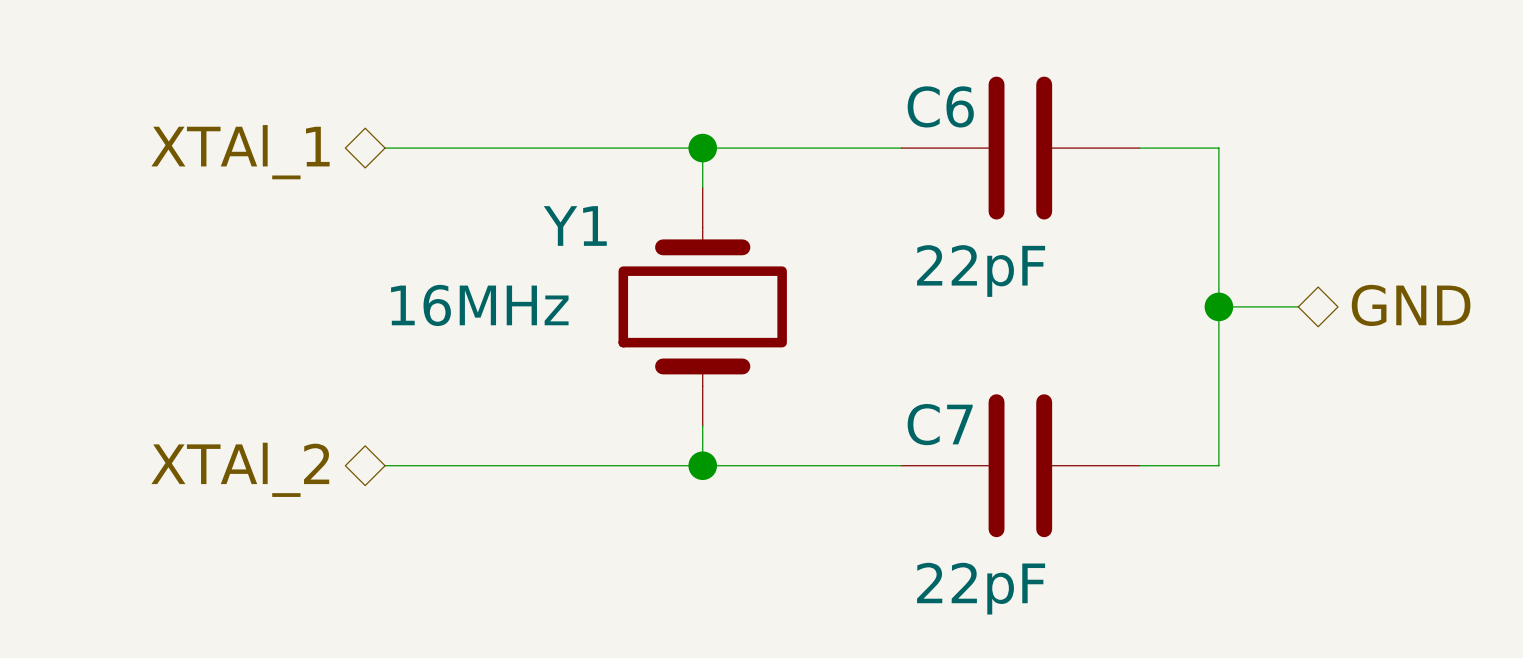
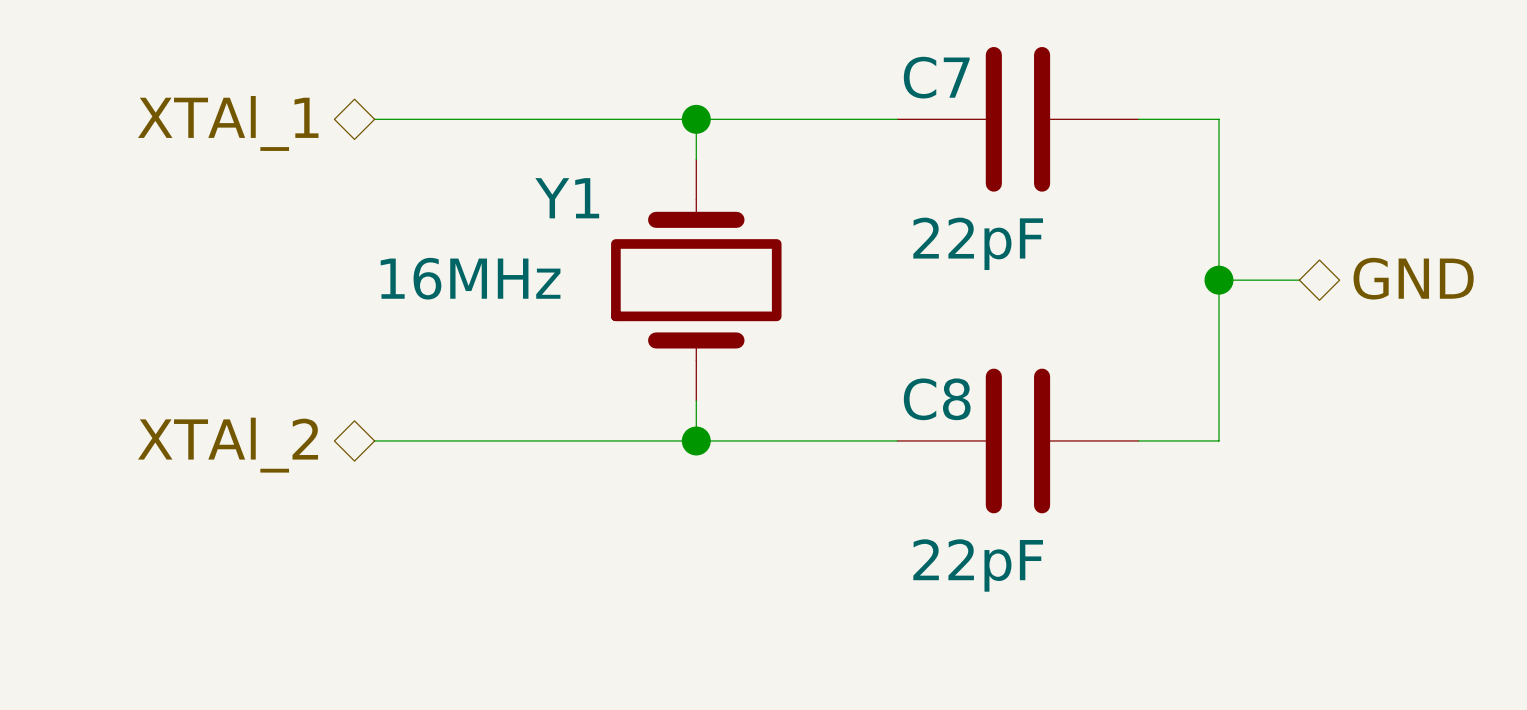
C6 name: C6 (940, 106) -> C7 (936, 77)
C7 name: C7 (940, 424) -> C8 (937, 399)

